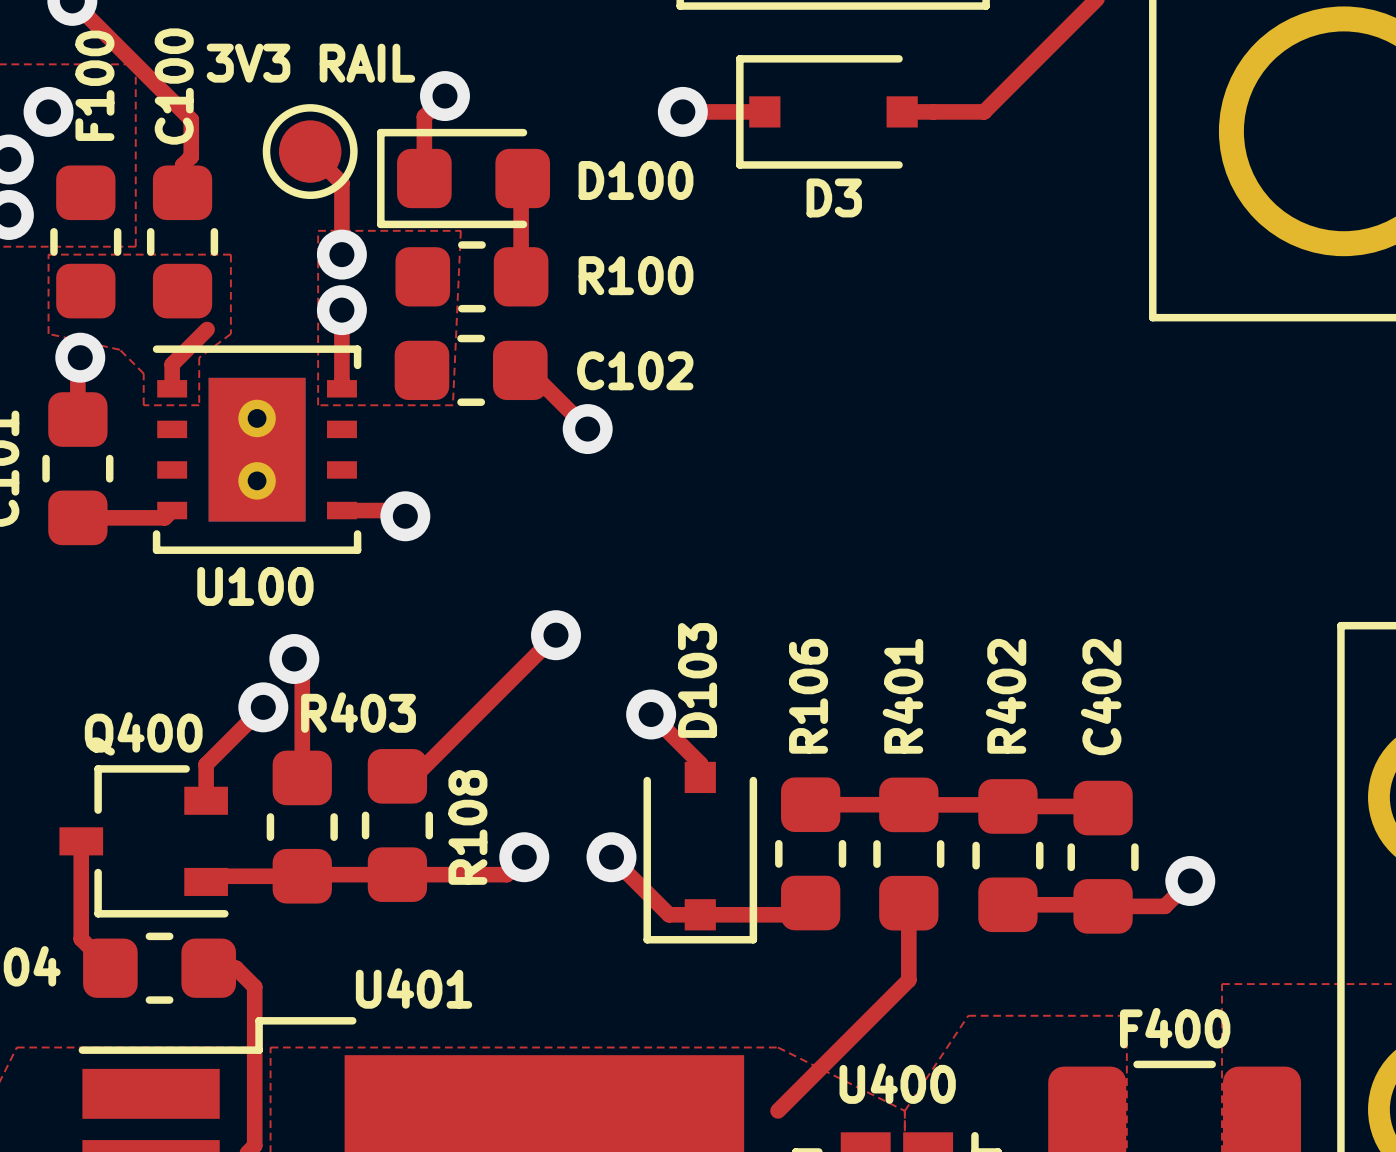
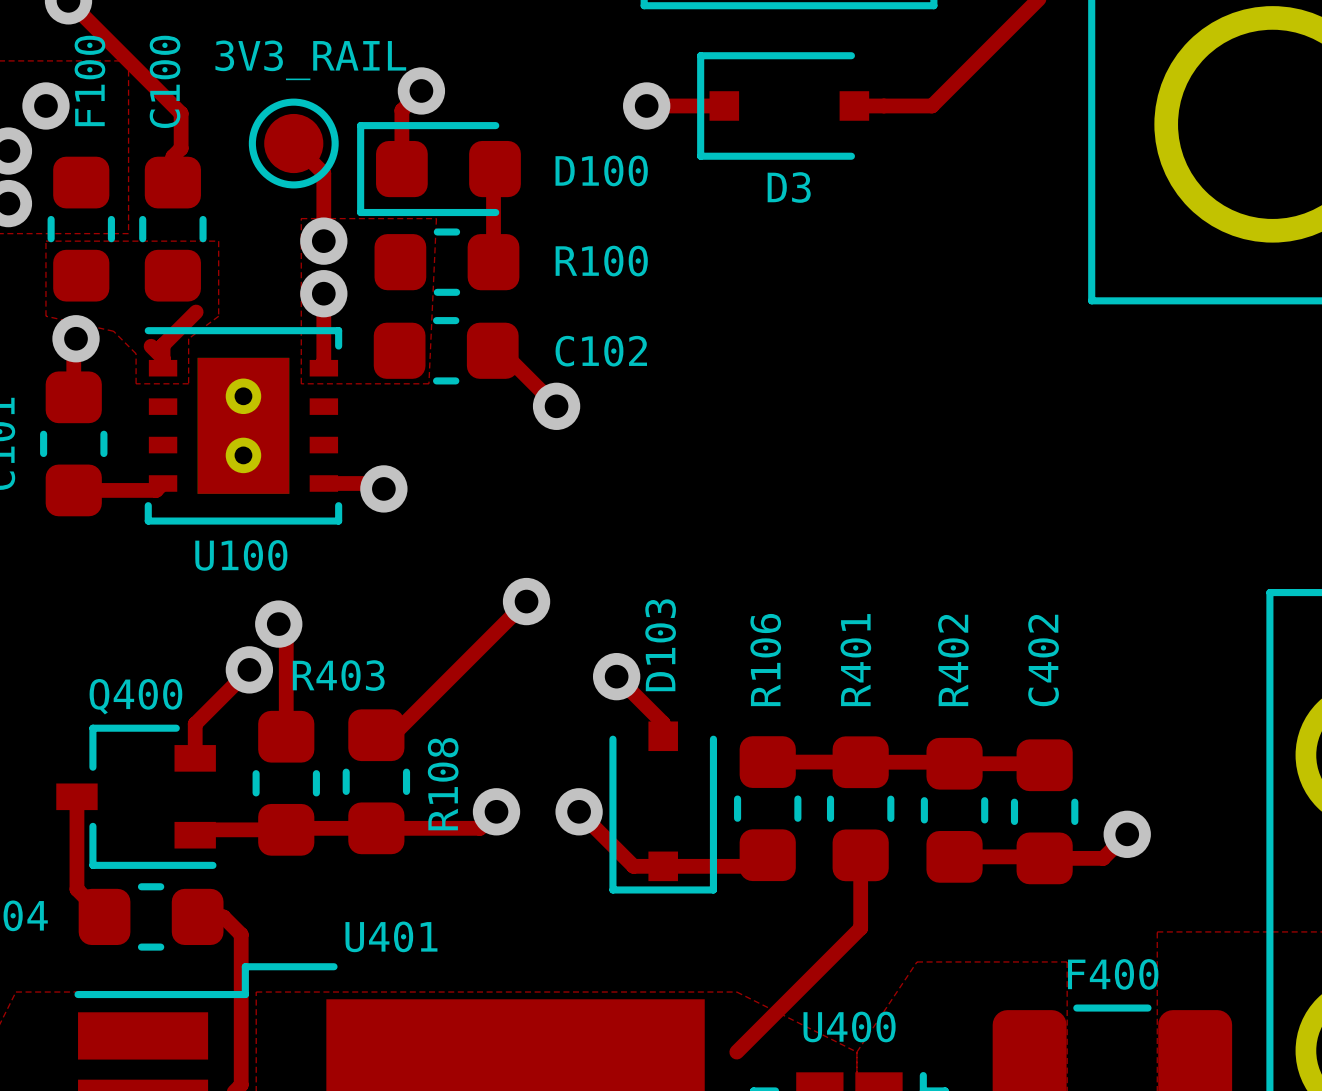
3V3 RAIL name: 3V3 RAIL (310, 63) -> 3V3_RAIL (310, 60)
top track: none -> (151, 346) (163, 358)

